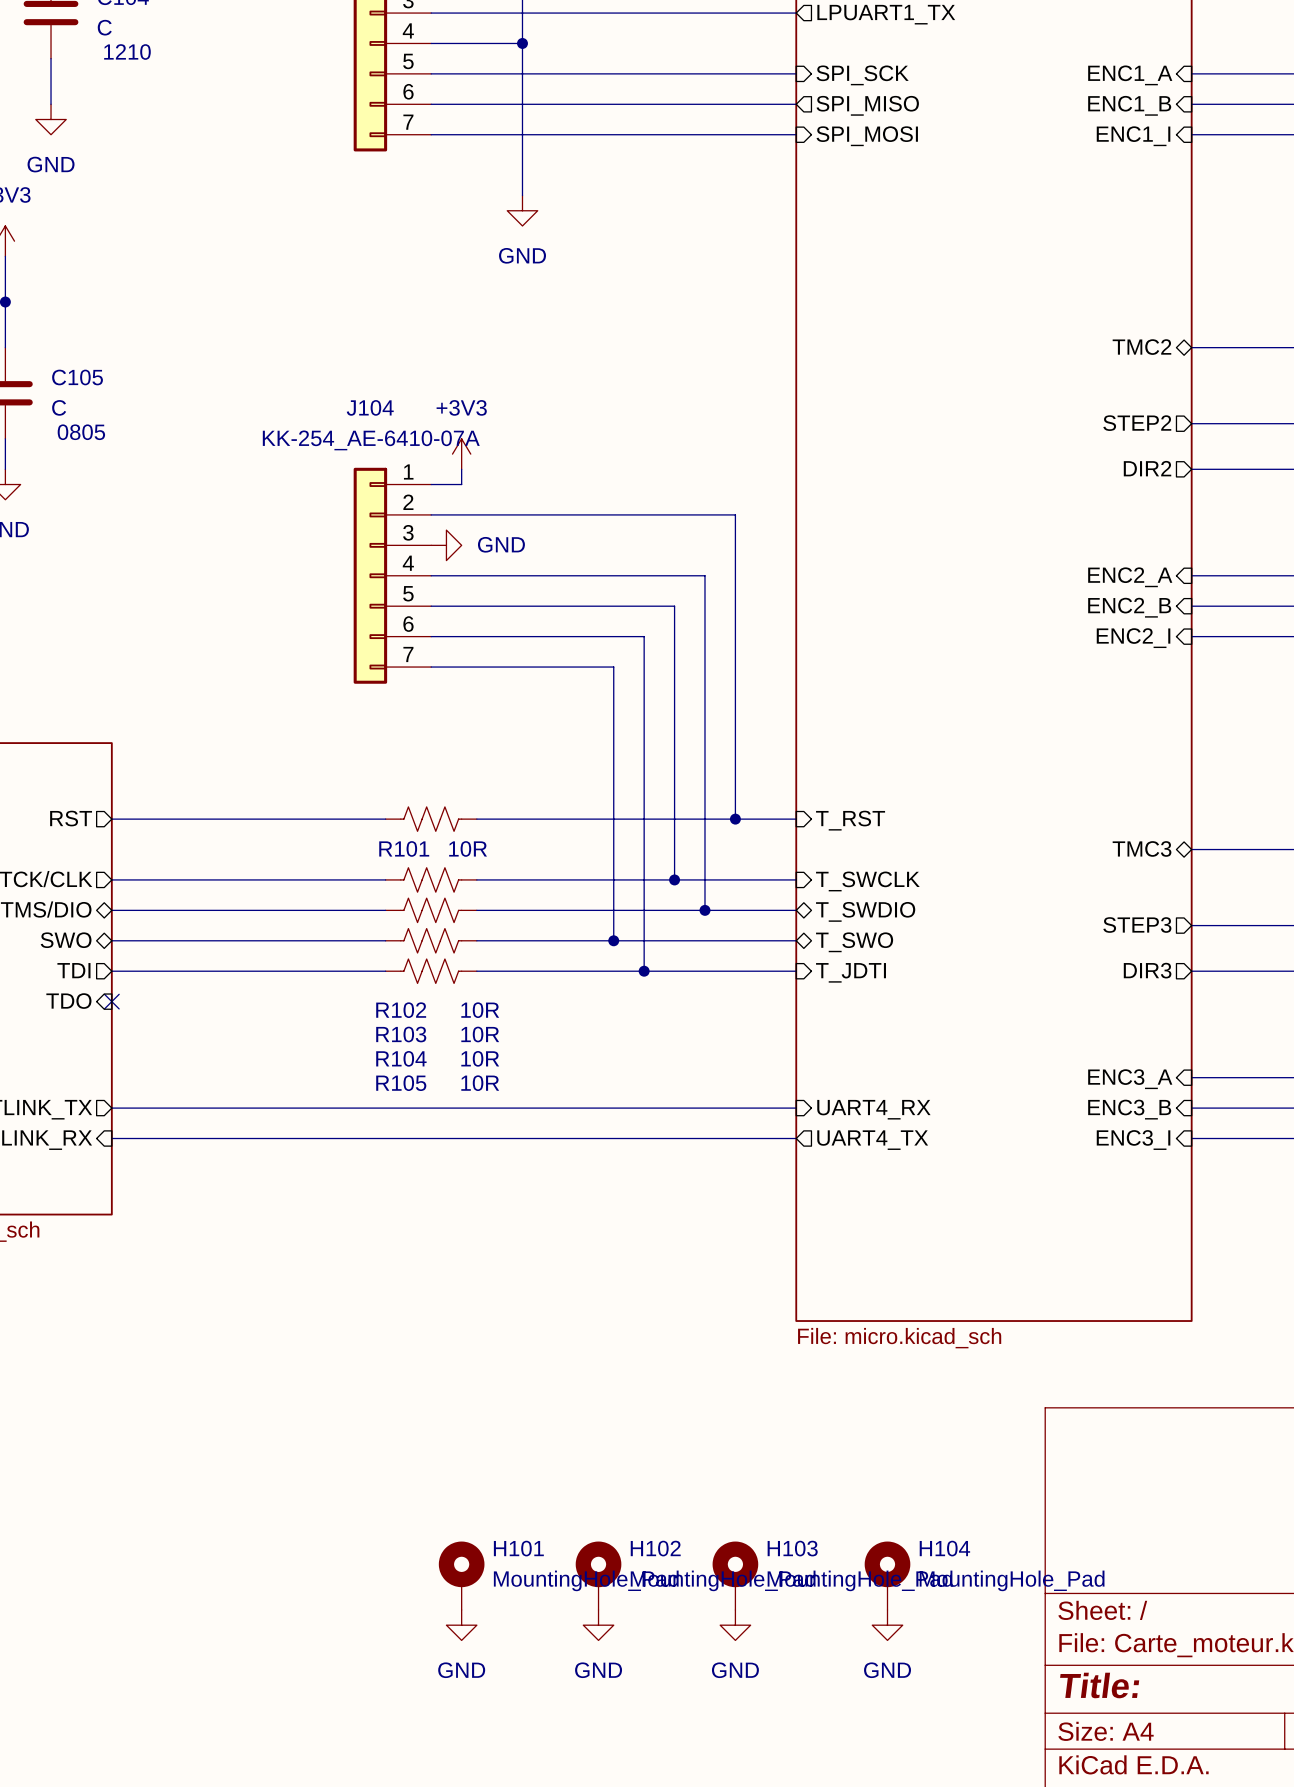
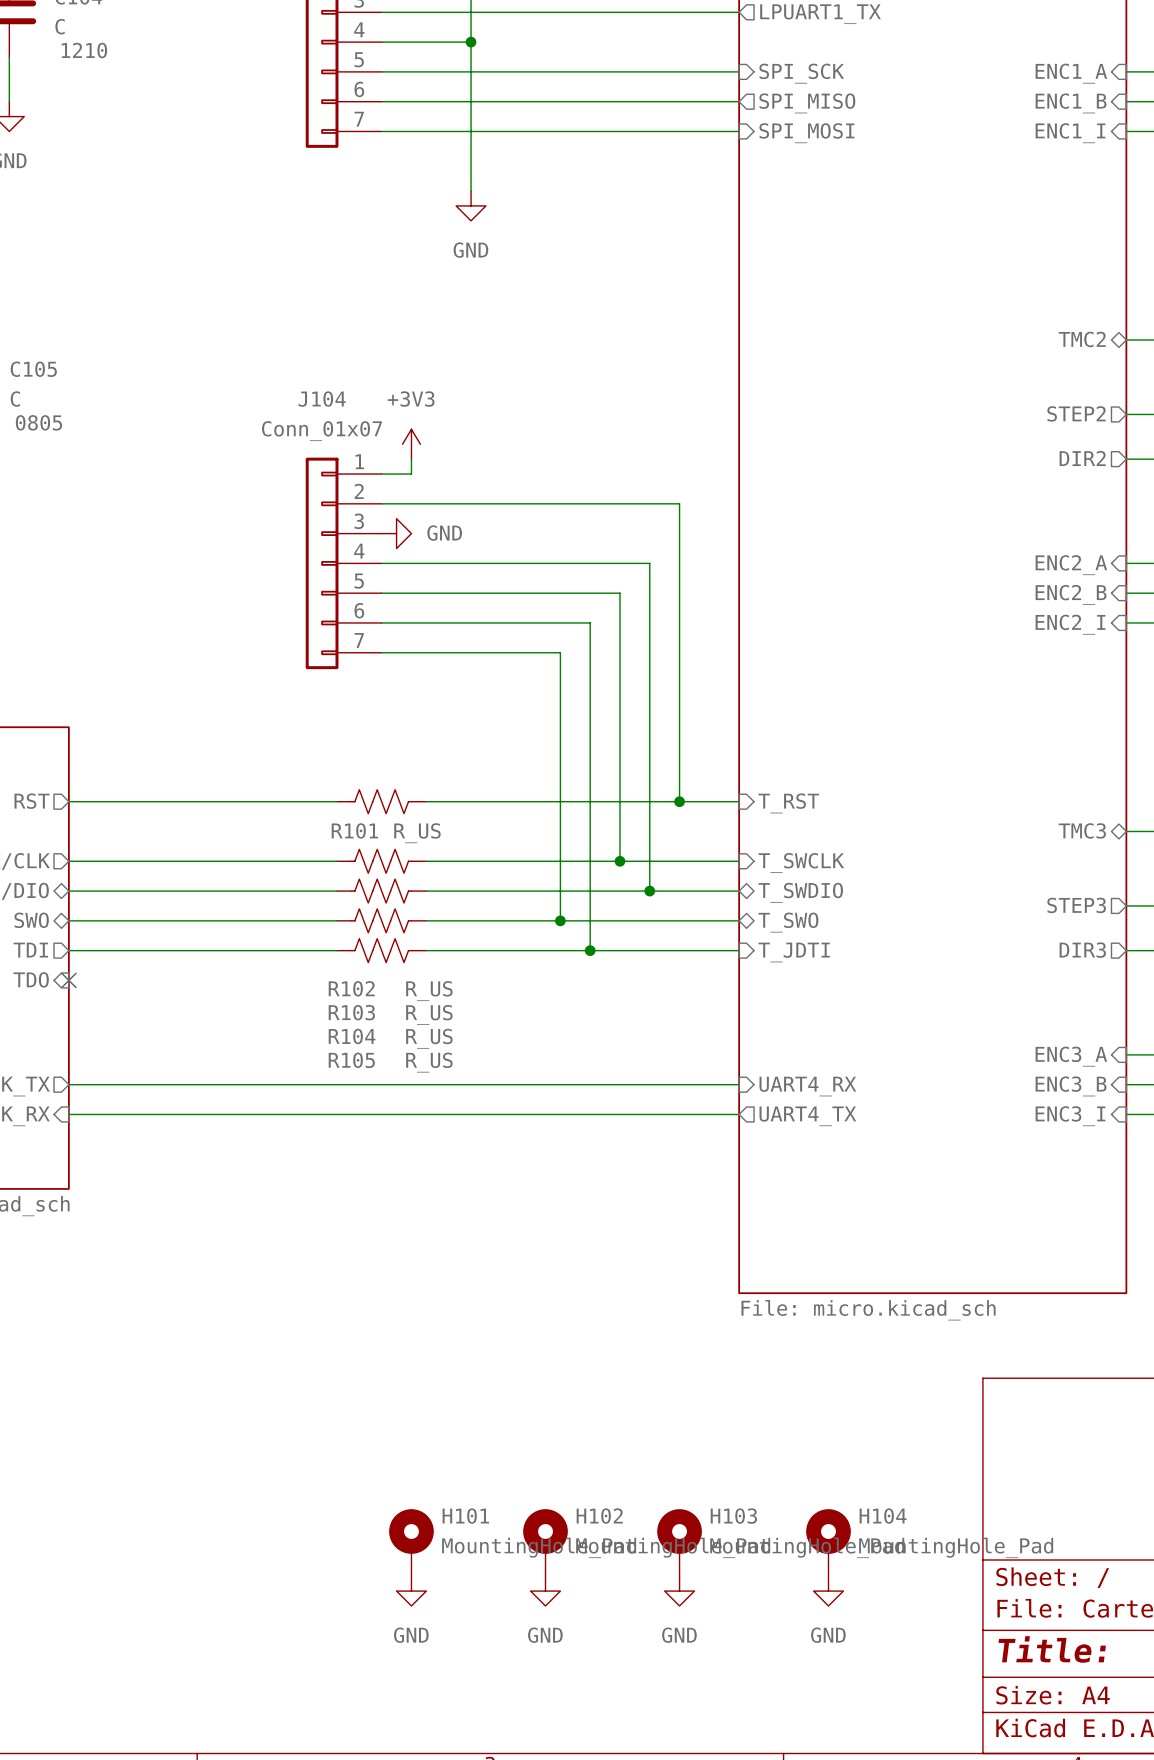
J104 value: KK-254_AE-6410-07A (371, 440) -> Conn_01x07 (322, 431)
R101 value: 10R (468, 848) -> R_US (417, 833)
R102 value: 10R (480, 1010) -> R_US (429, 991)
R103 value: 10R (480, 1034) -> R_US (429, 1014)
R104 value: 10R (480, 1058) -> R_US (429, 1038)
R105 value: 10R (480, 1083) -> R_US (429, 1062)

